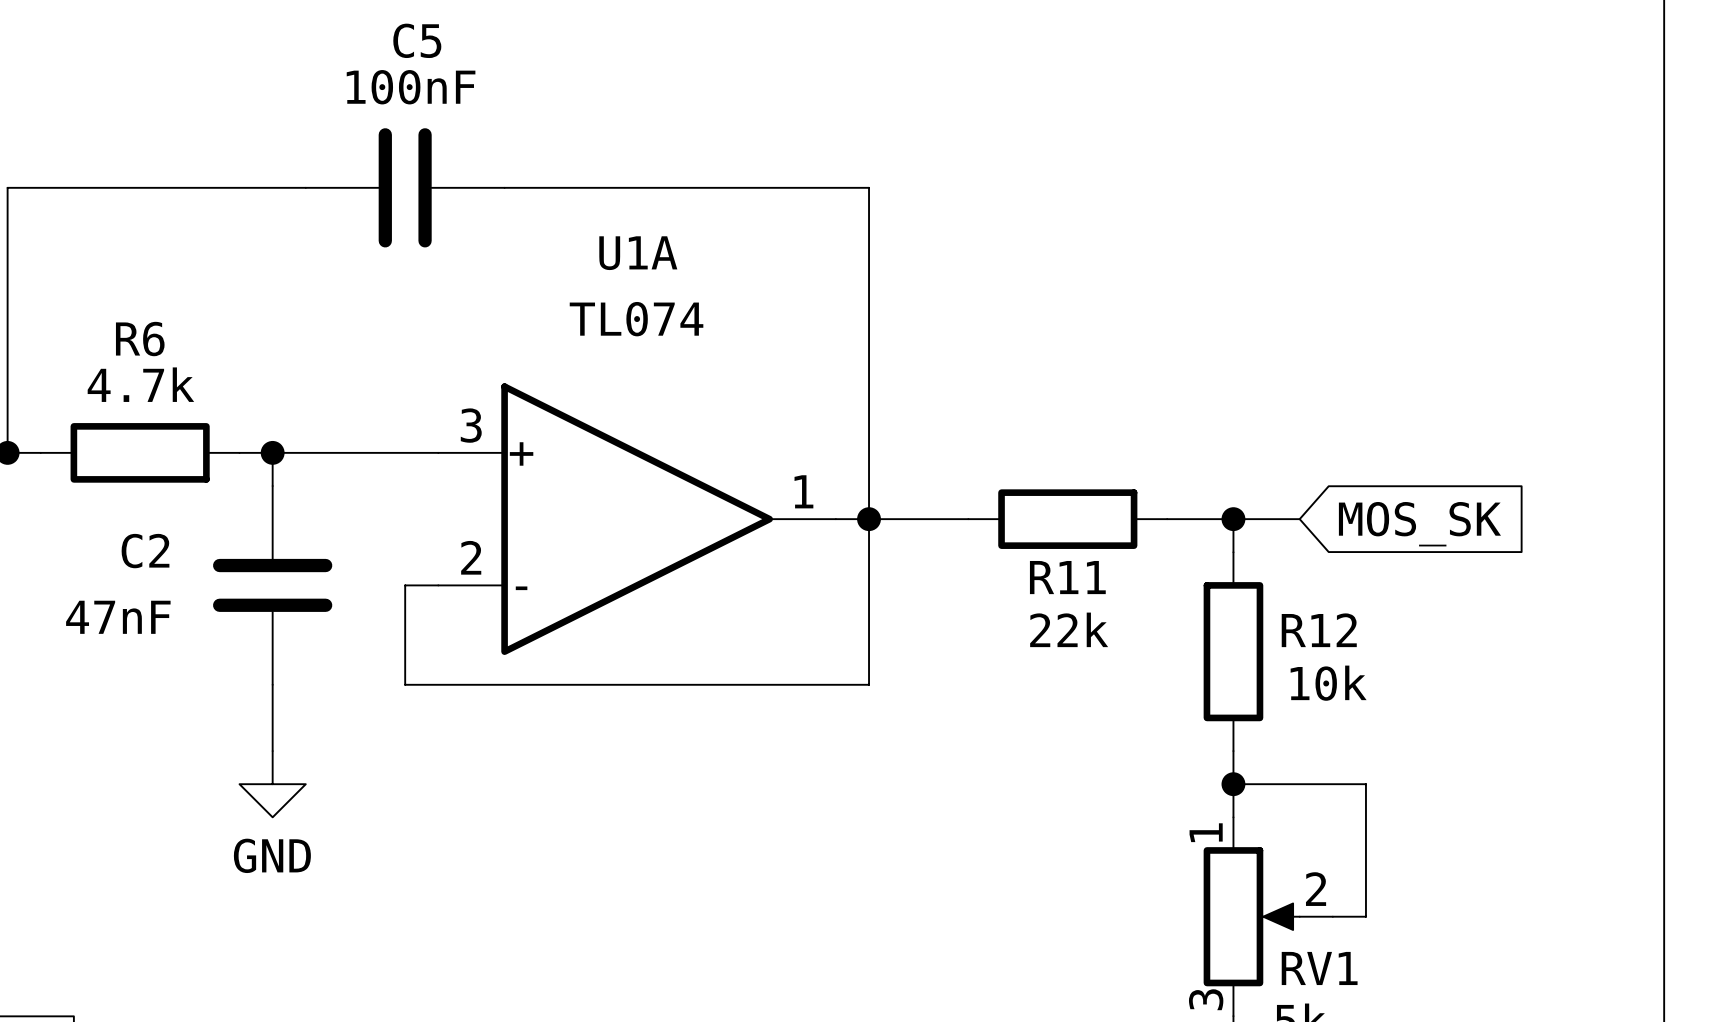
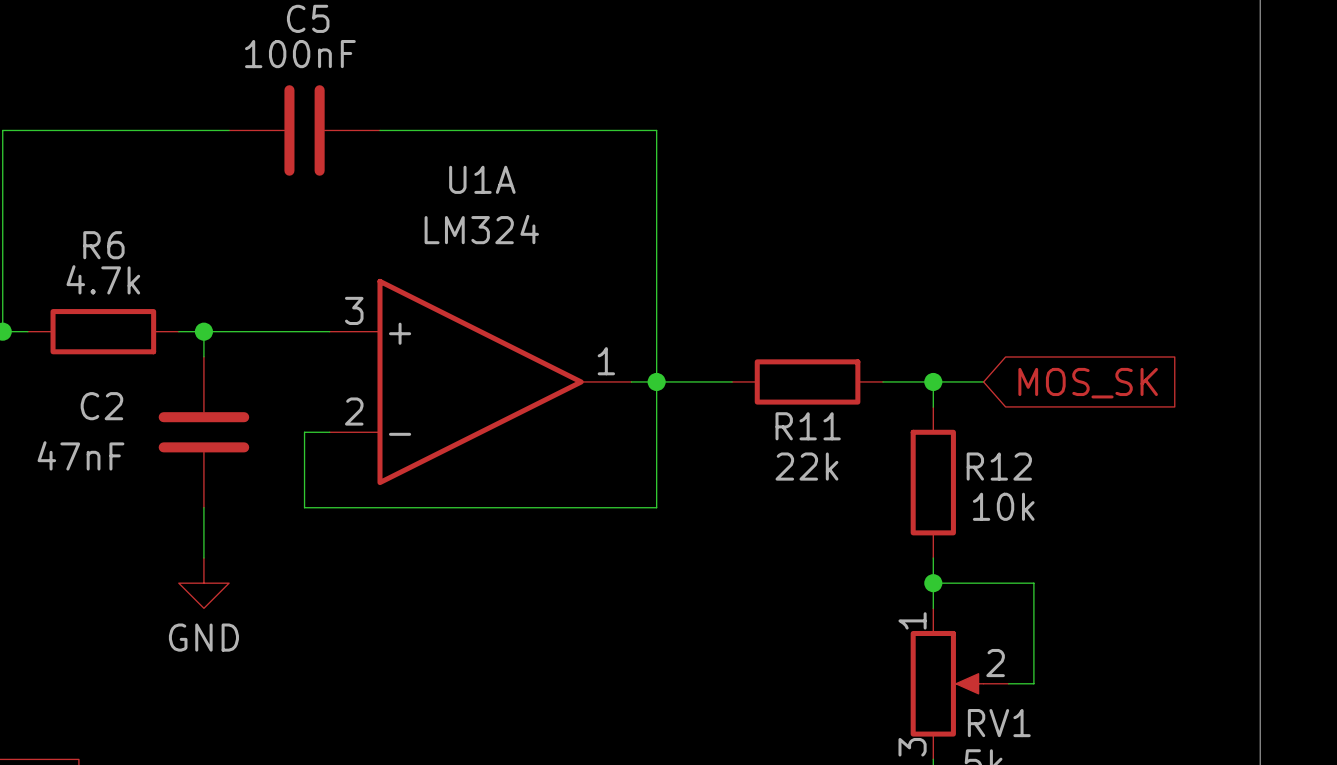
U1A value: TL074 (636, 319) -> LM324 (481, 229)

